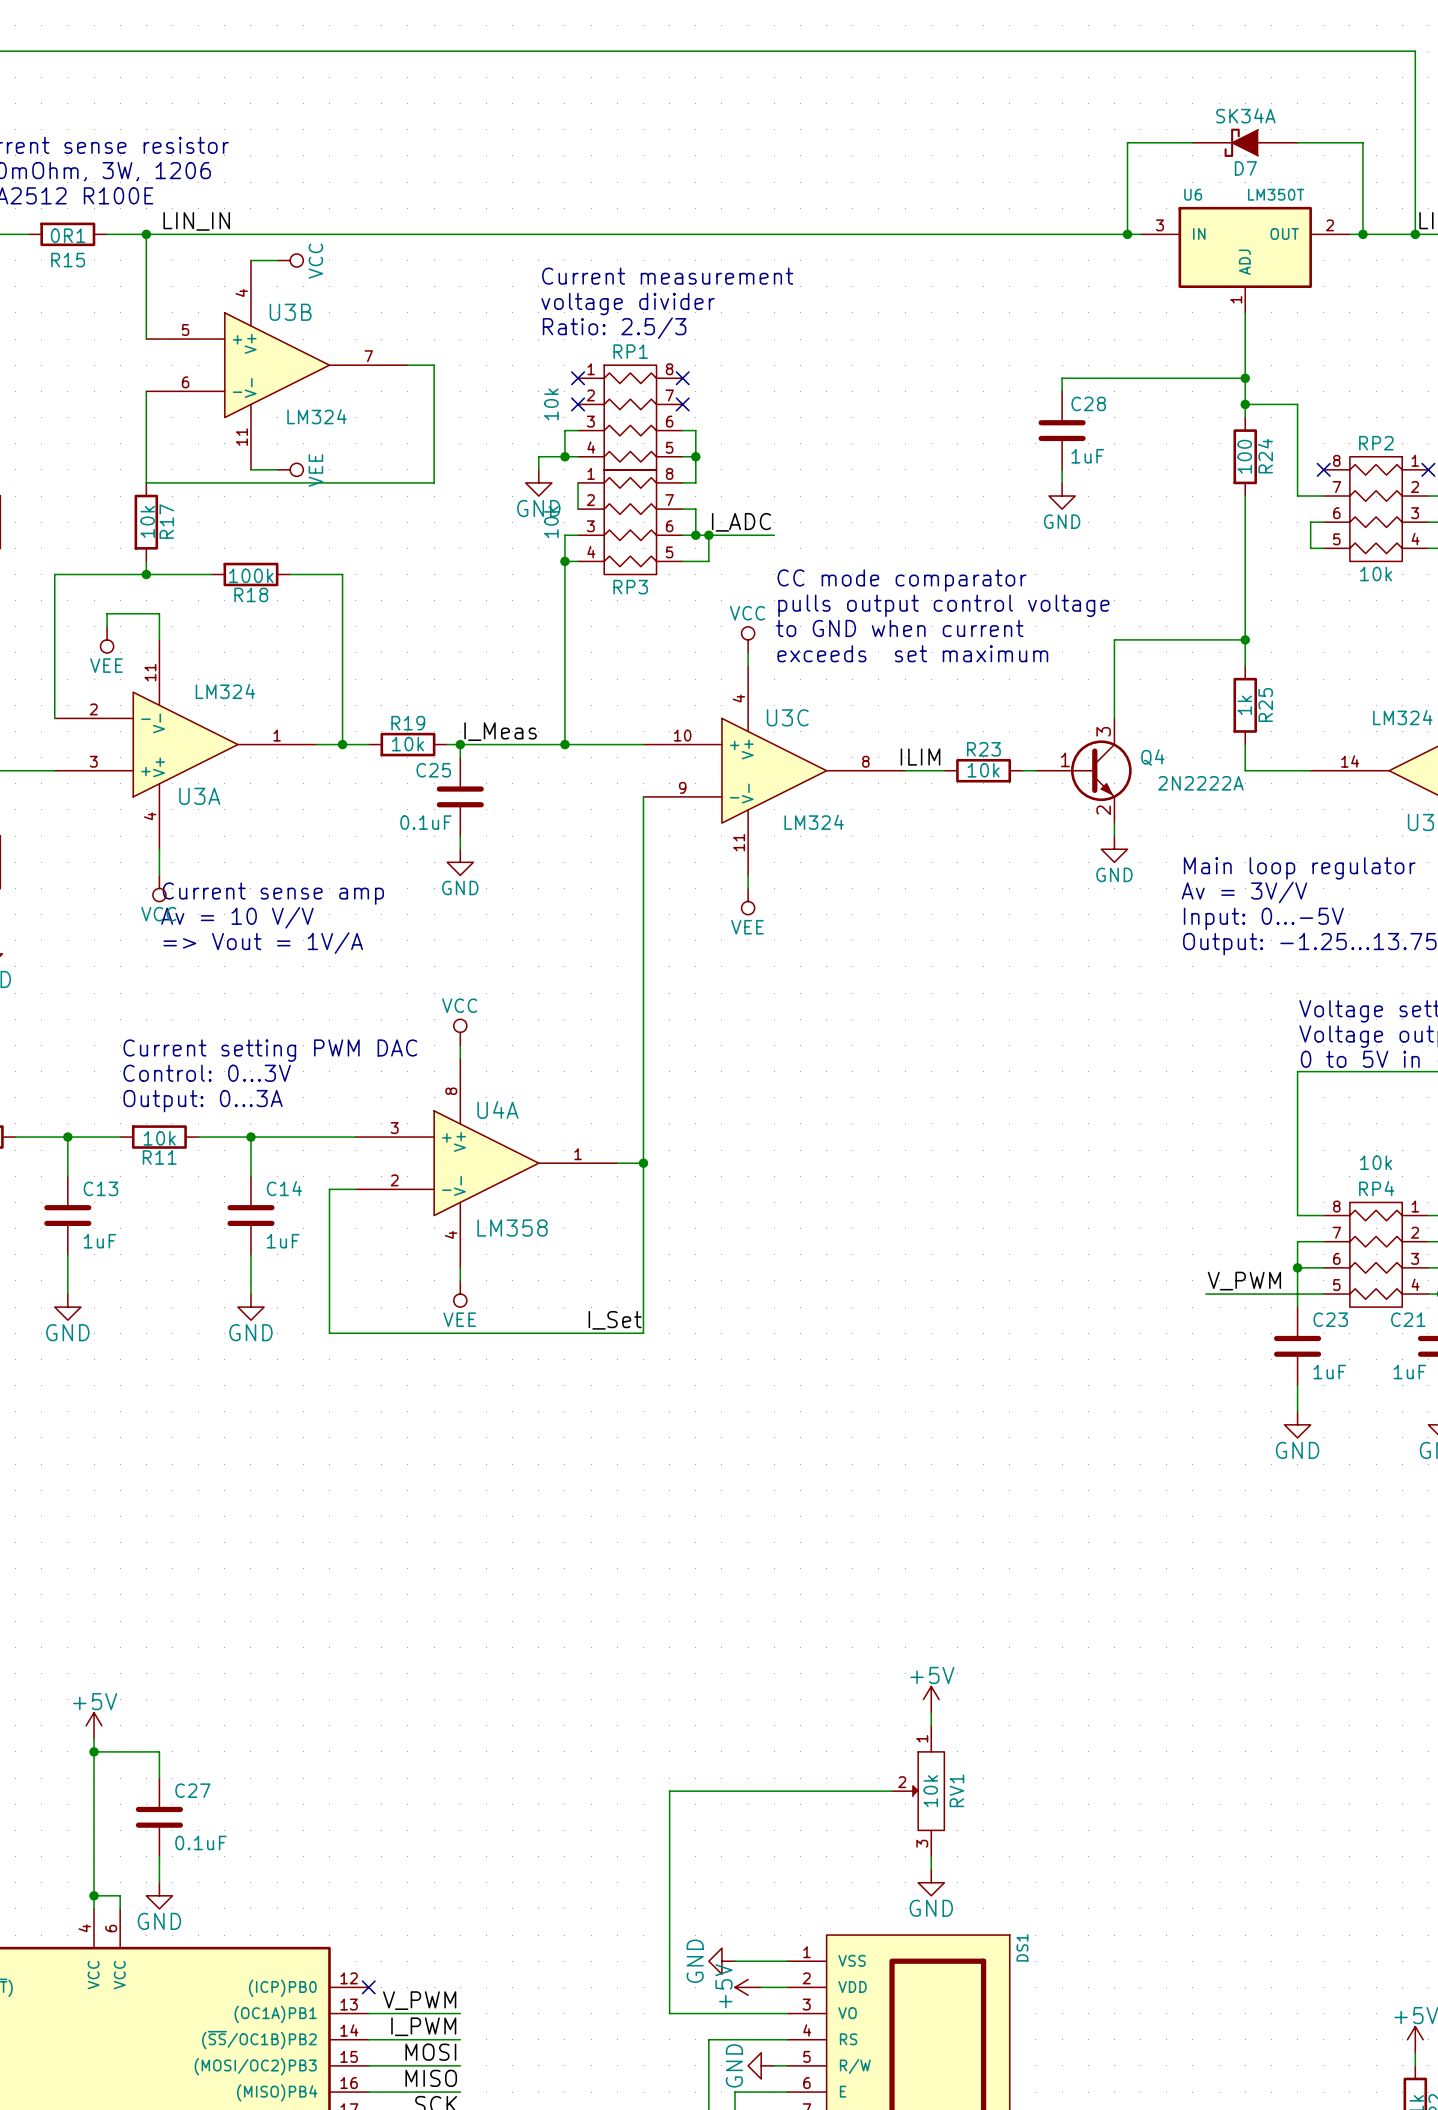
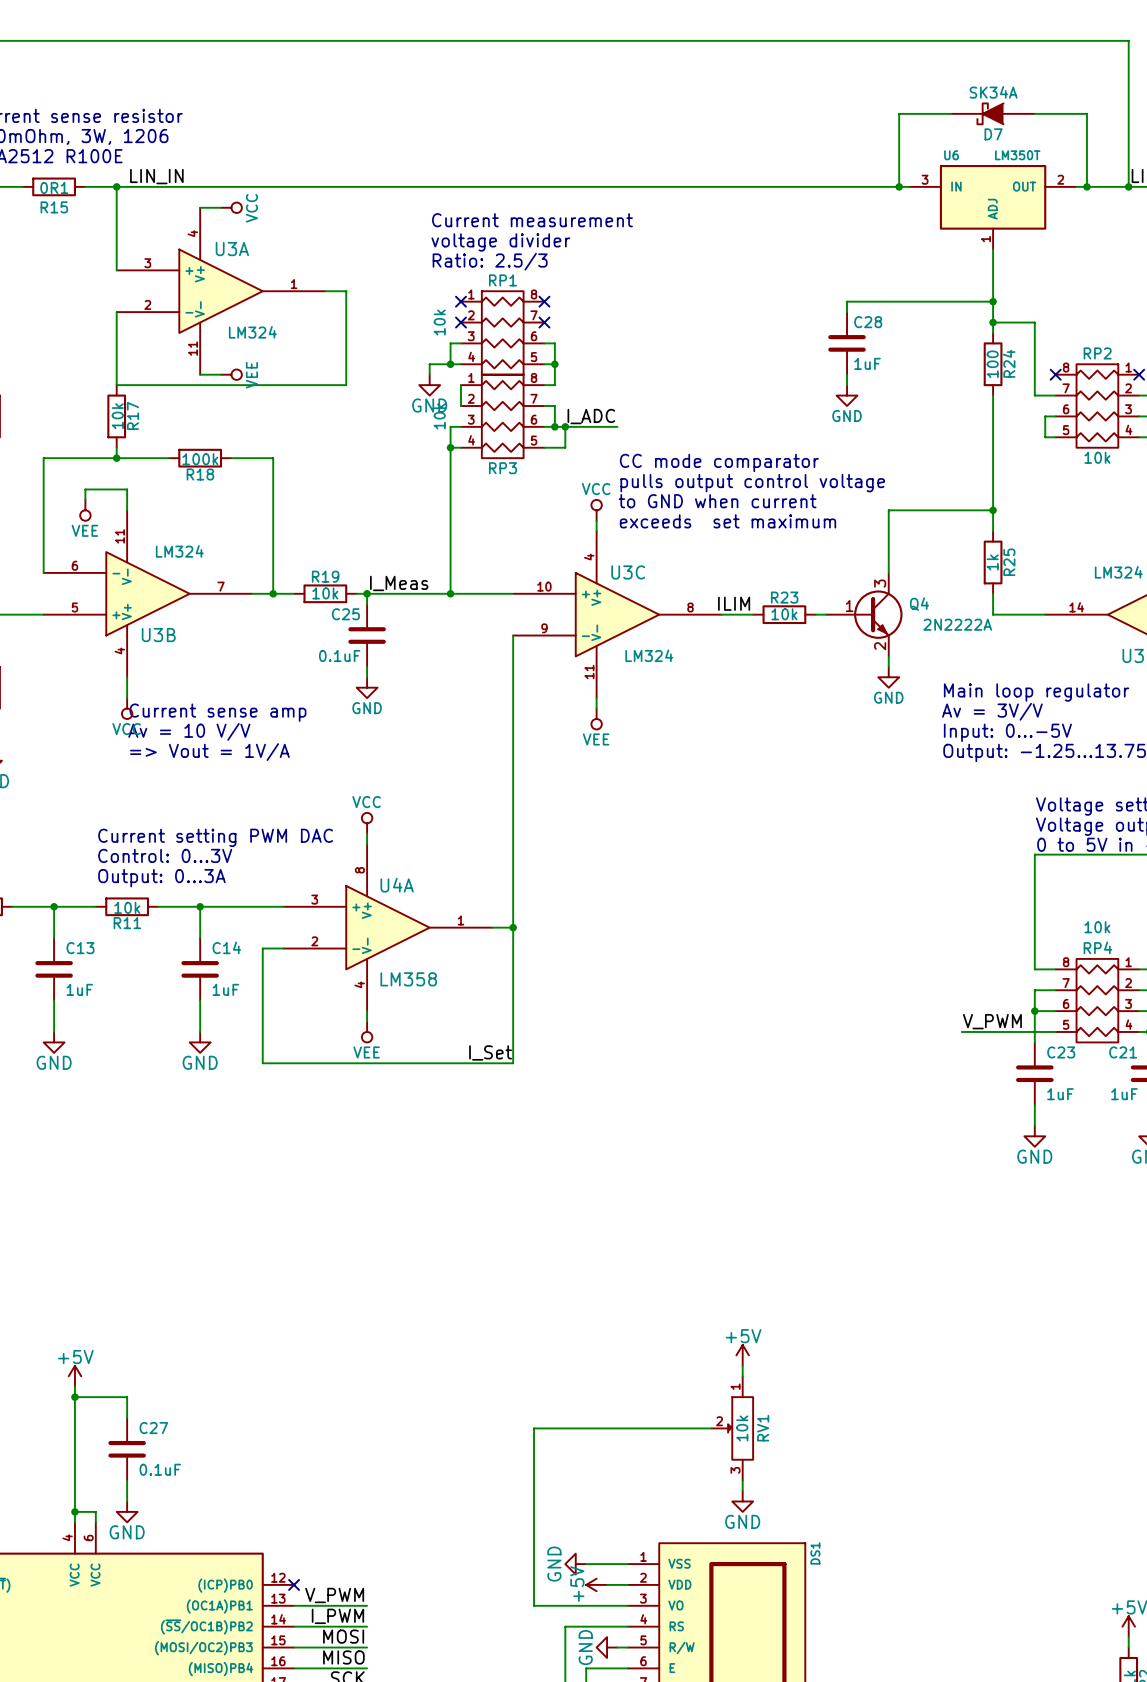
U3B flip: as is (277, 365) -> up-down (147, 593)
U3B position: (277, 365) -> (147, 593)
U3A flip: as is (185, 744) -> up-down (221, 291)
U3A position: (185, 744) -> (221, 291)

